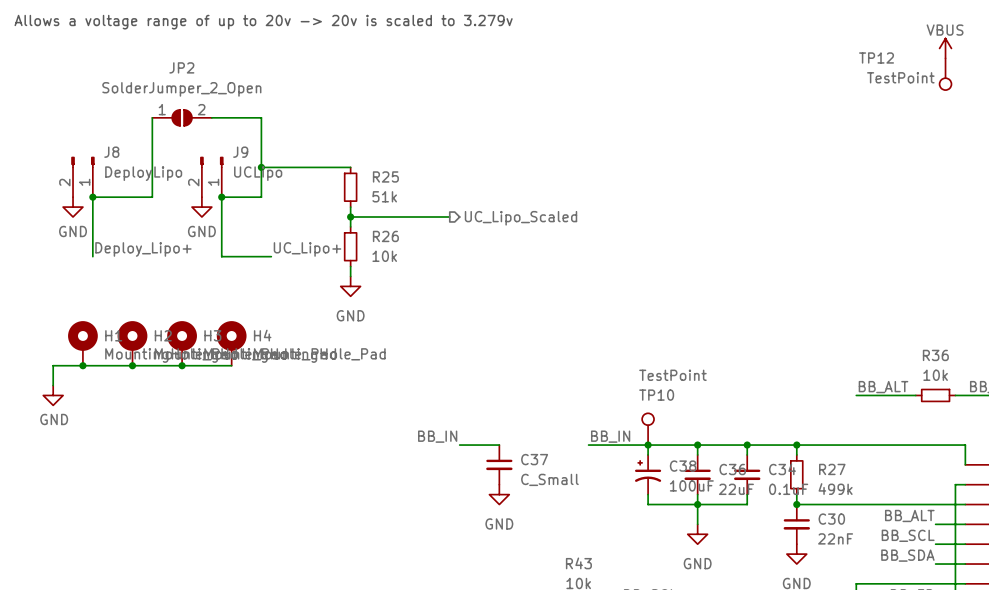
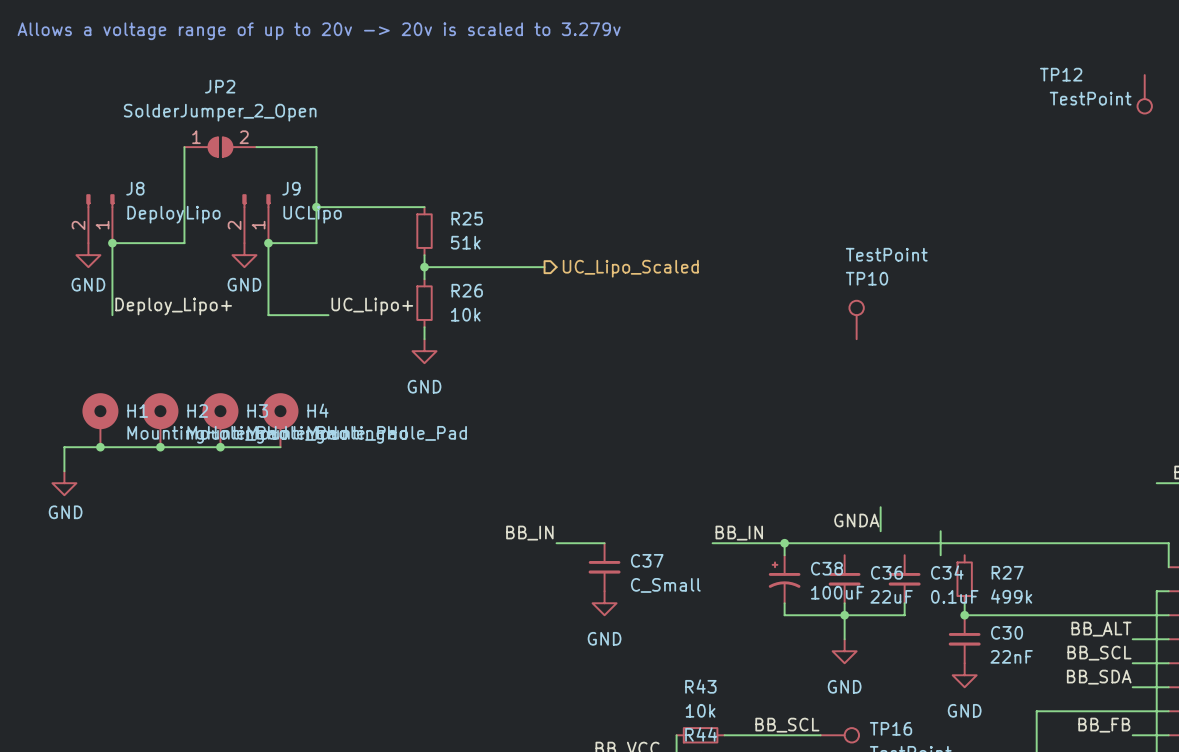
power symbol: VBUS (945, 48) -> none
label: BB_ALT (883, 387) -> none
wire: (856, 395) (915, 395) -> none
R36: 10k (935, 395) -> none
wire: none -> (880, 507) (880, 531)
label: none -> GNDA (856, 520)
TP10 position: (648, 429) -> (856, 319)
wire: none -> (940, 531) (940, 555)
wire: (697, 445) (697, 454) -> none
junction: (697, 445) -> none
wire: (747, 445) (747, 454) -> none
junction: (747, 445) -> none
wire: (796, 445) (796, 454) -> none
junction: (796, 445) -> none

